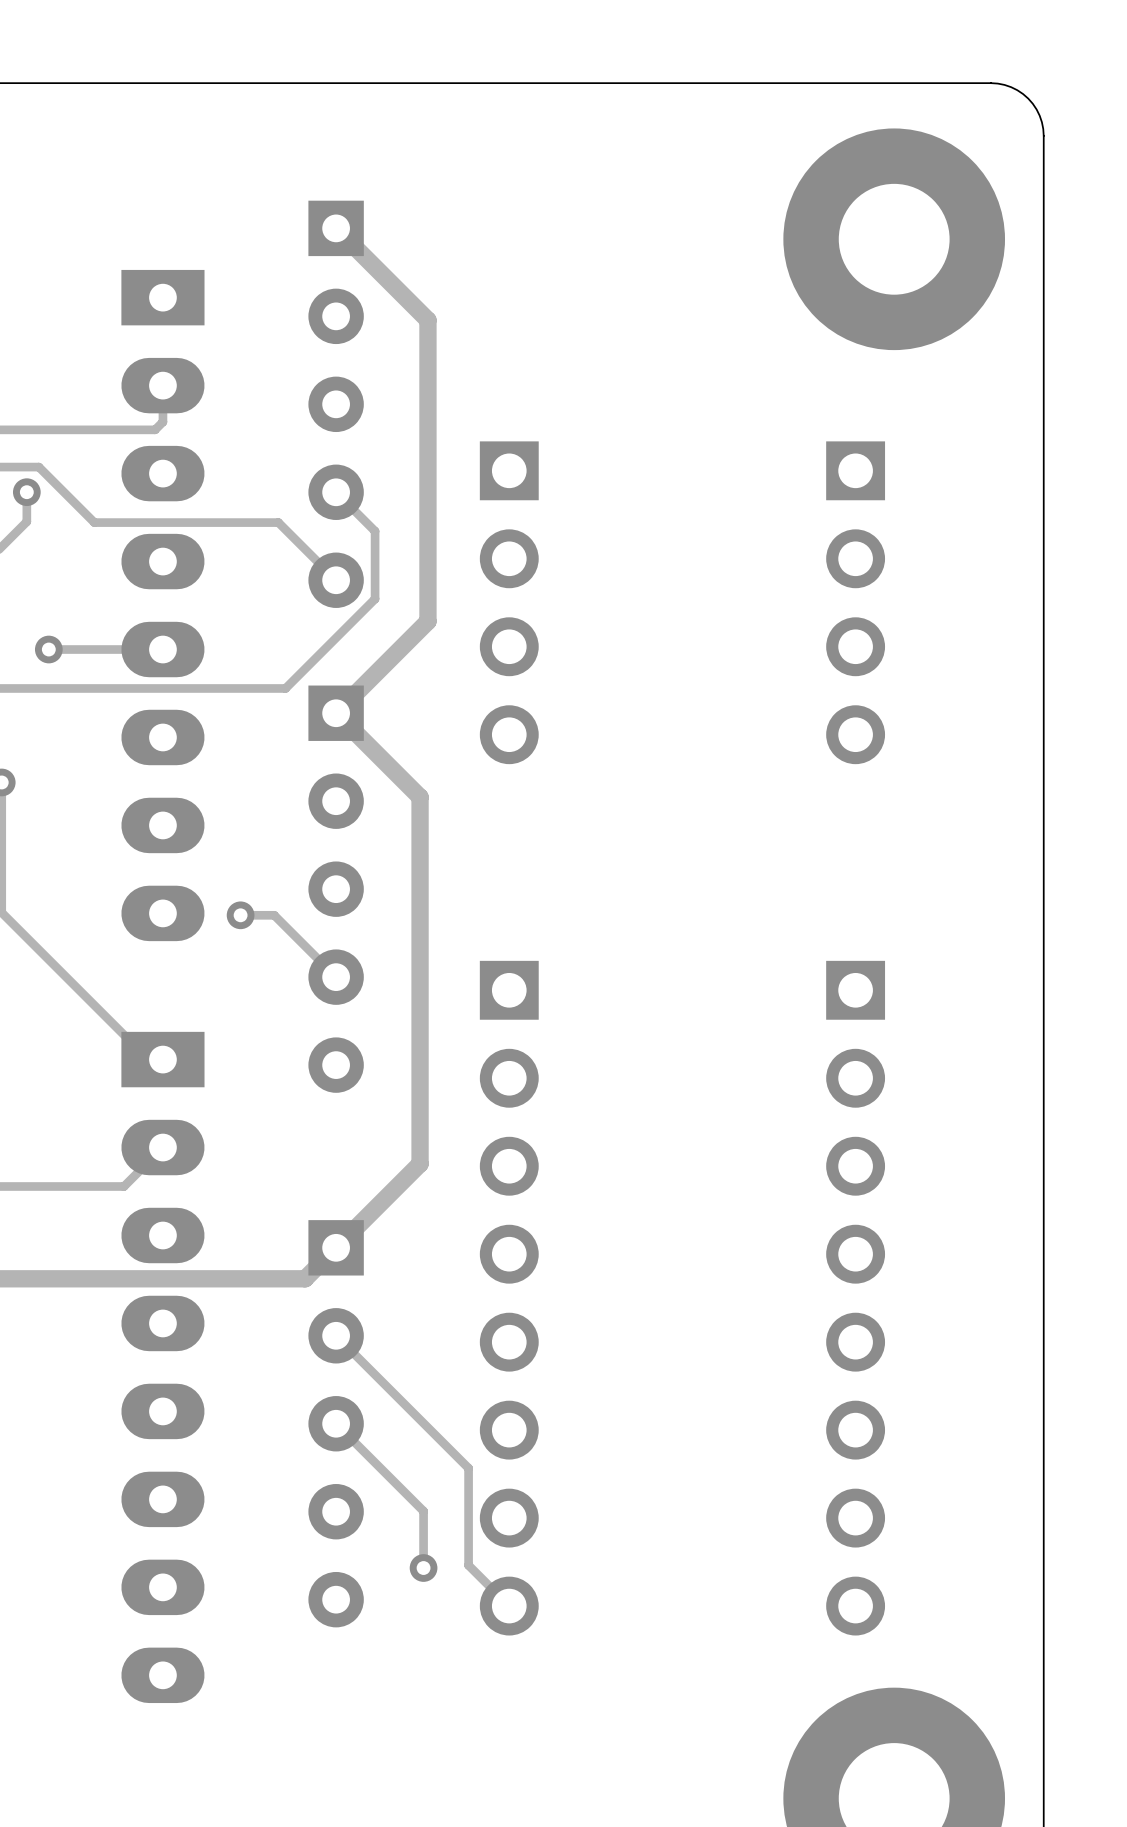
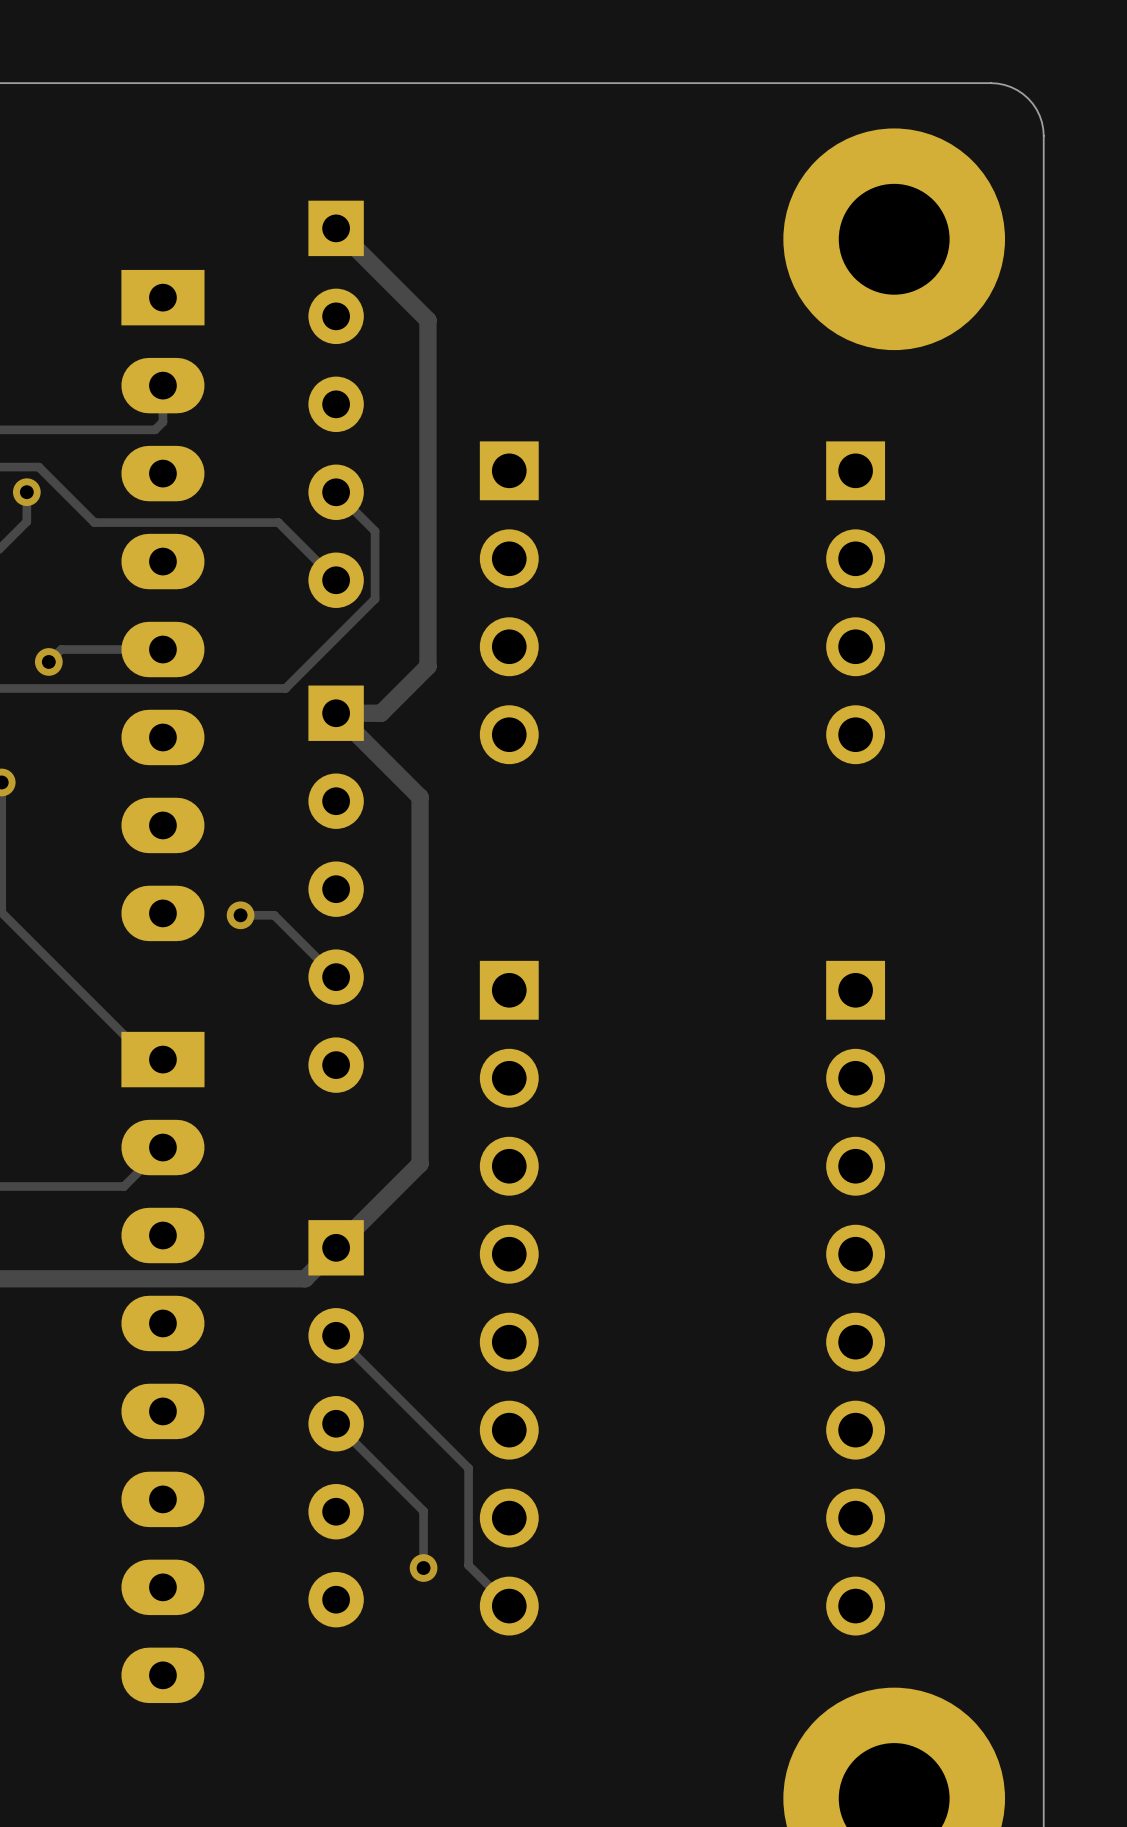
track: (427, 621) (336, 713) -> (427, 621) (427, 666) (381, 713) (336, 713)
via position: (48, 649) -> (48, 661)

